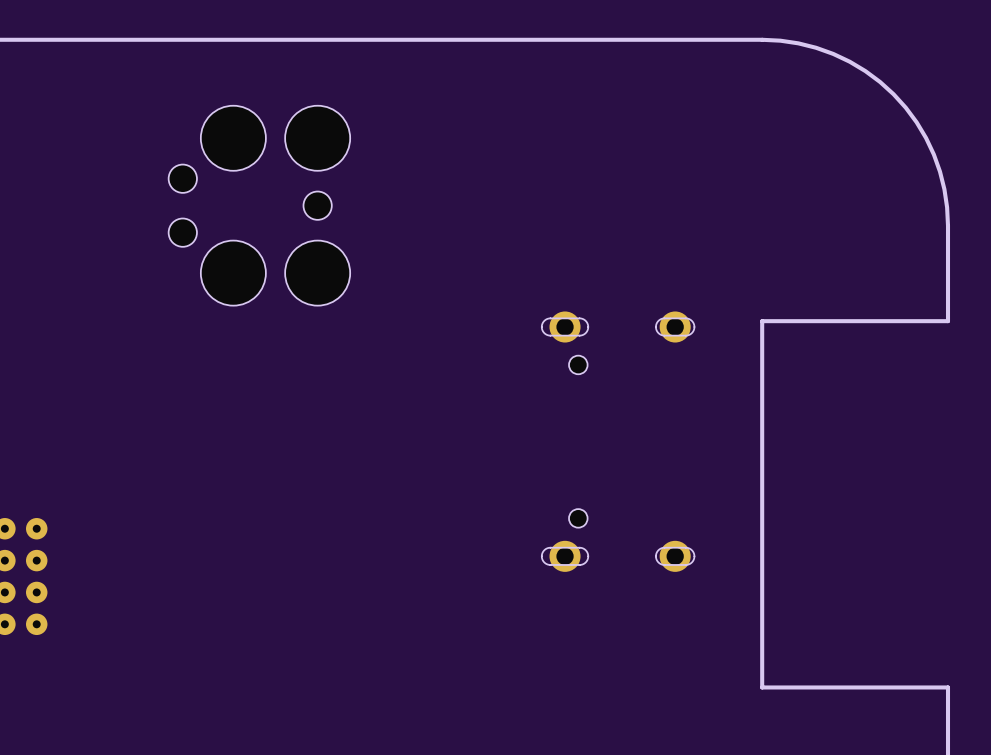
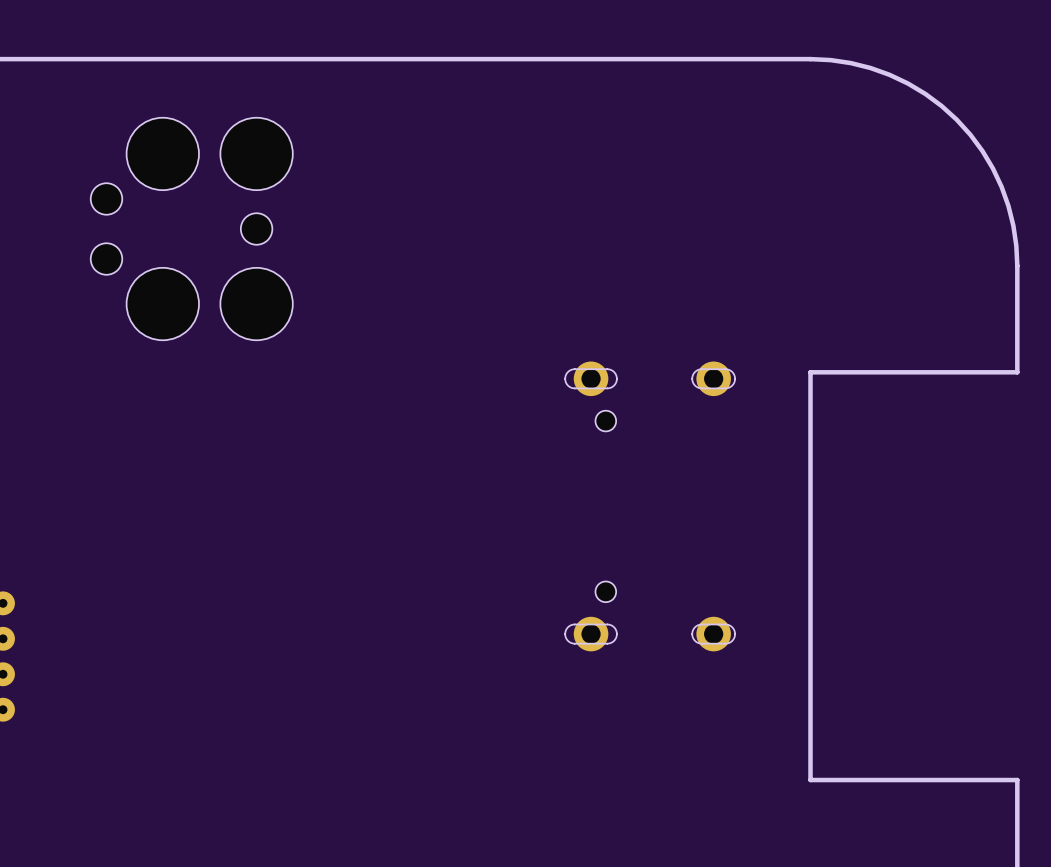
part position: (259, 205) -> (191, 229)

